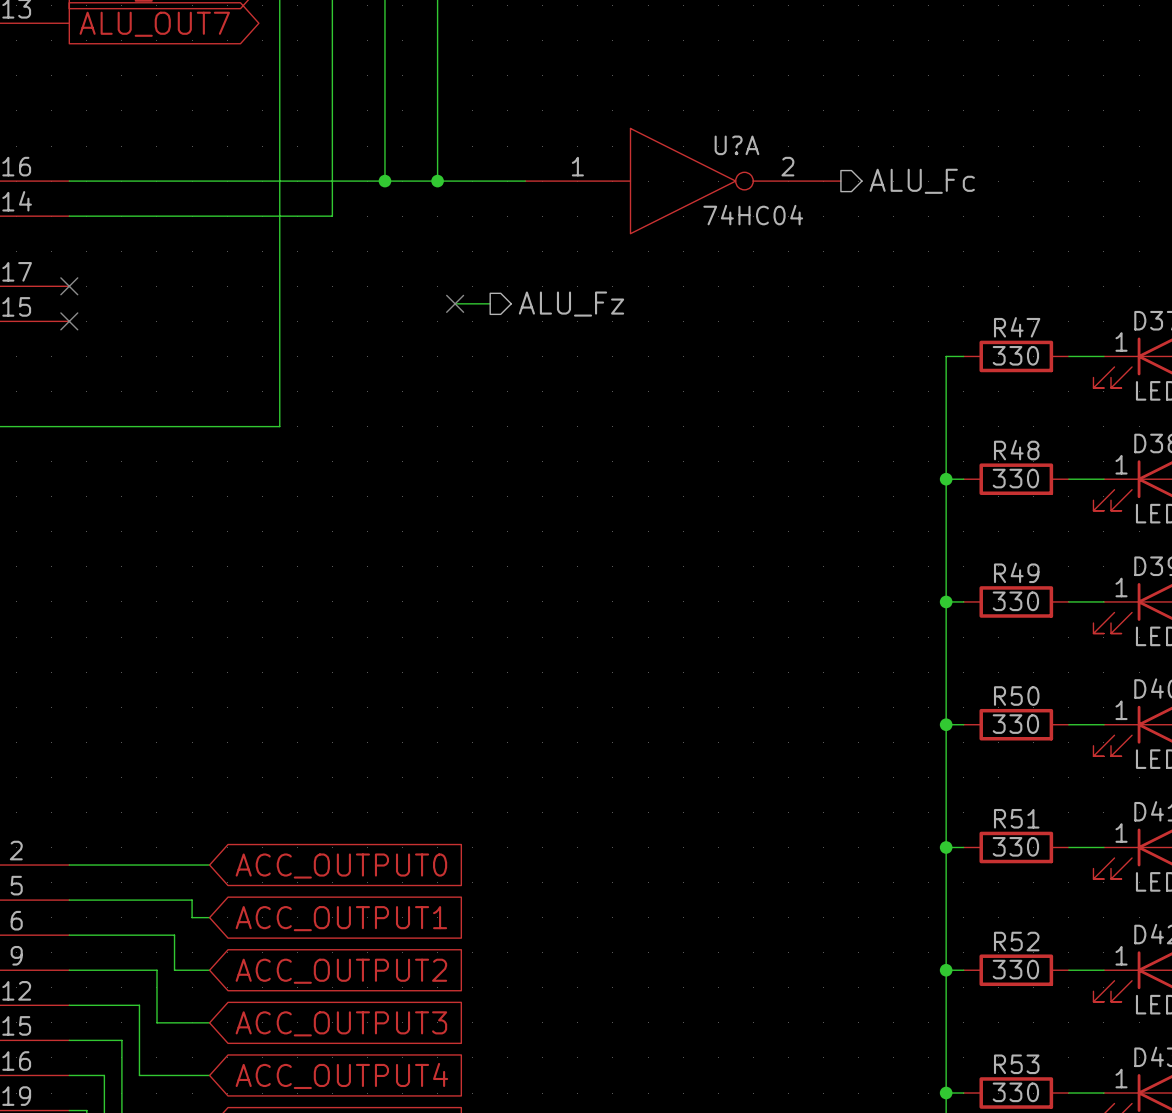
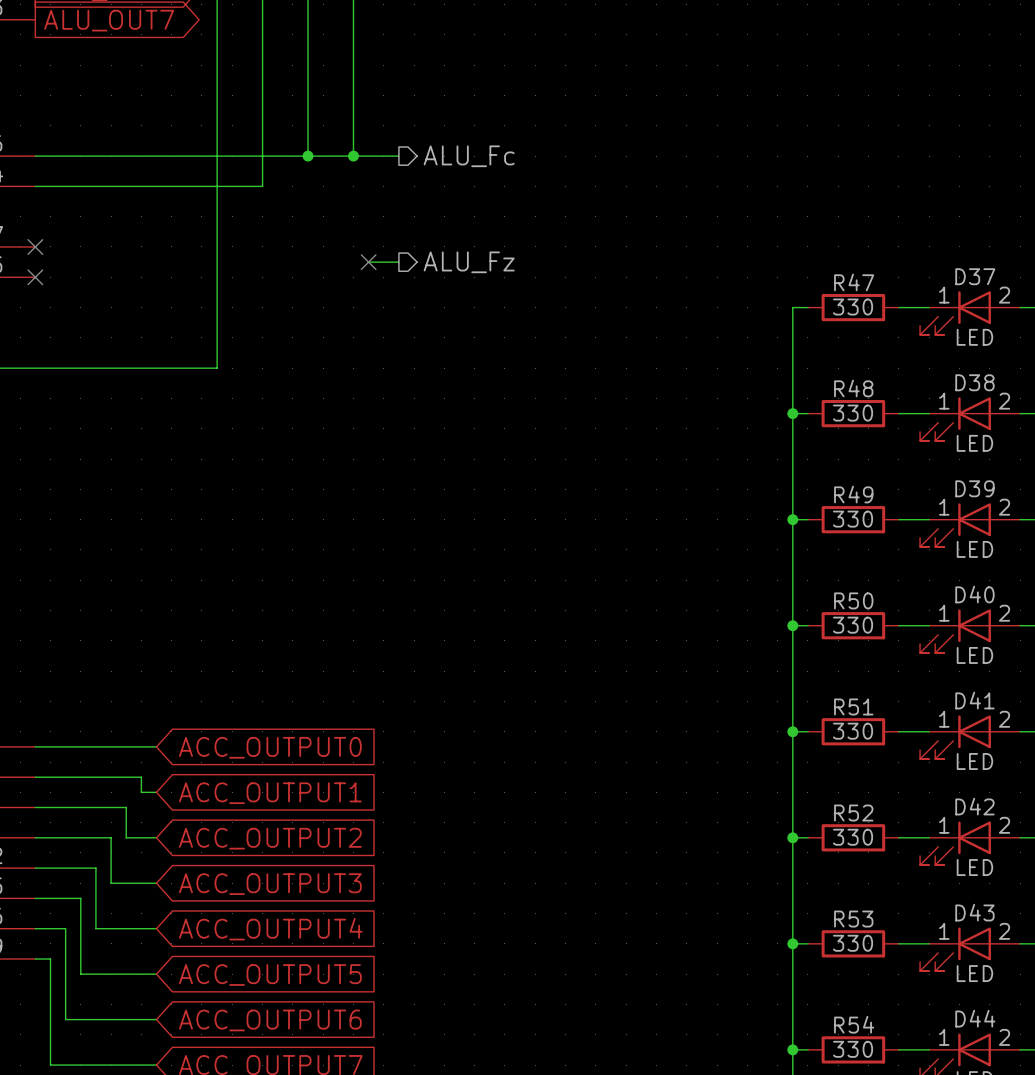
wire: (490, 181) (525, 181) -> none
hierarchical label: none -> ALU_Fc (469, 156)
U?A: 74HC04 (683, 181) -> none
hierarchical label: ALU_Fc (922, 181) -> none

